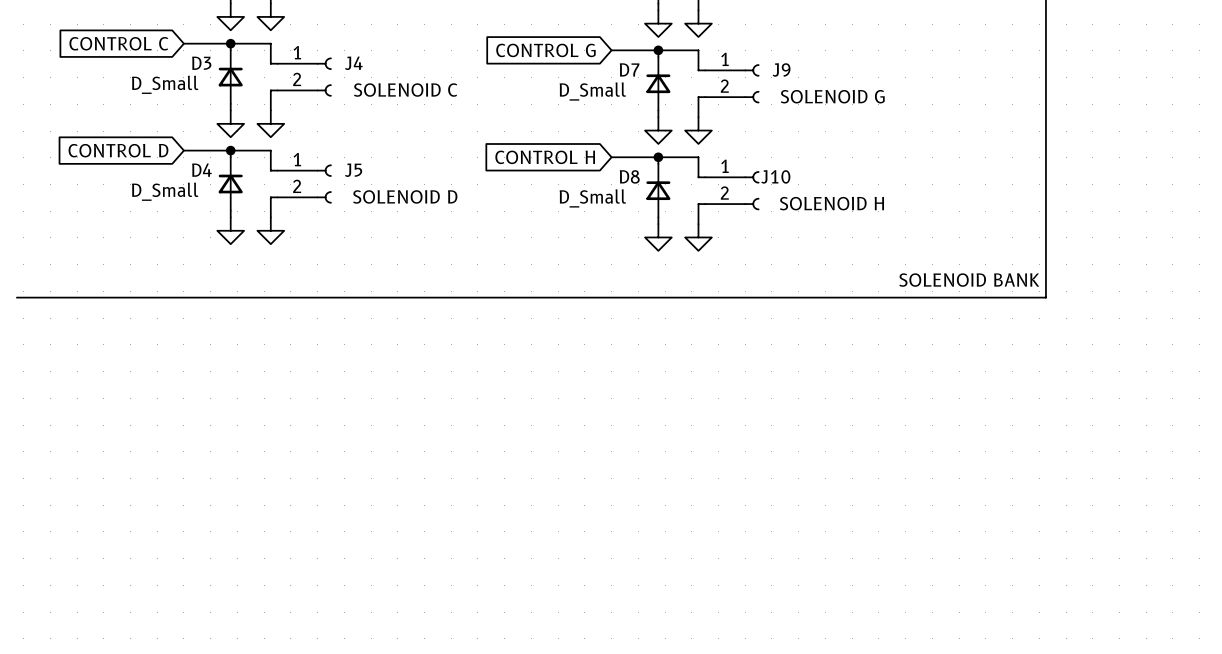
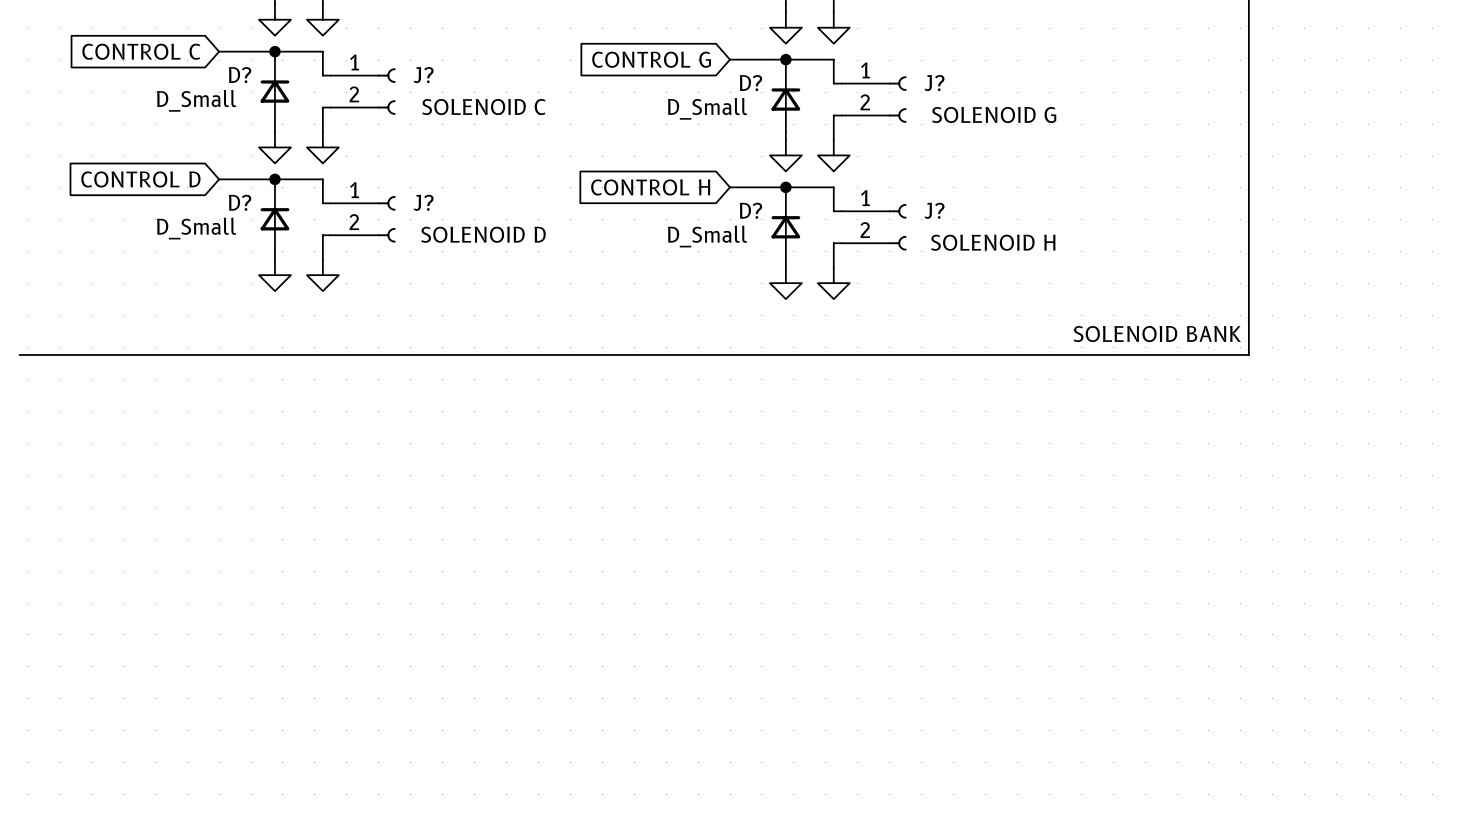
D3 name: D3 (201, 63) -> D? (240, 75)
J4 name: J4 (353, 63) -> J? (423, 75)
D7 name: D7 (629, 69) -> D? (750, 83)
J9 name: J9 (781, 69) -> J? (934, 83)
D4 name: D4 (201, 170) -> D? (240, 202)
J5 name: J5 (353, 170) -> J? (423, 202)
D8 name: D8 (629, 176) -> D? (750, 210)
J10 name: J10 (775, 176) -> J? (934, 210)

